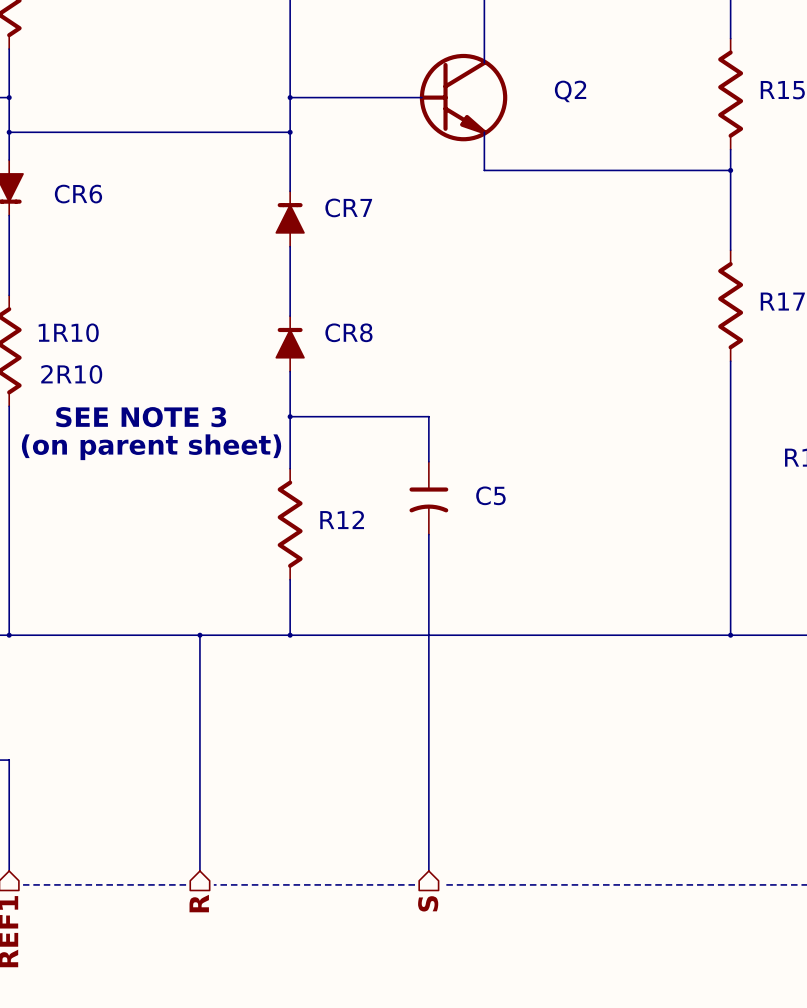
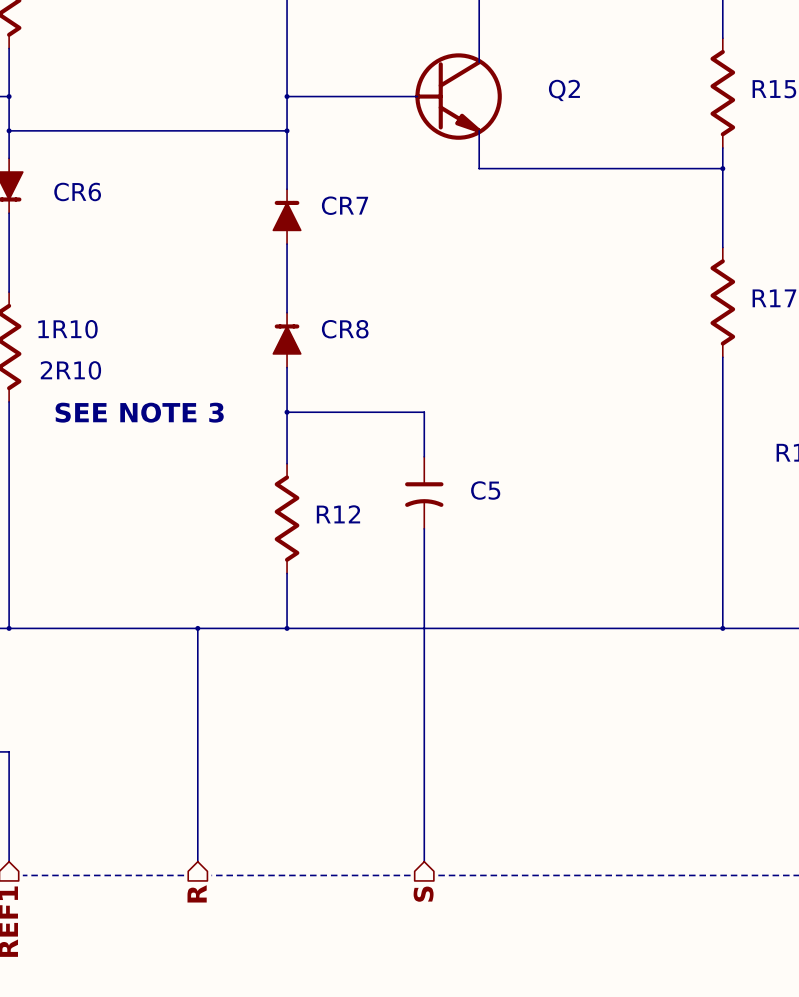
text: (on parent sheet) (151, 447) -> none

